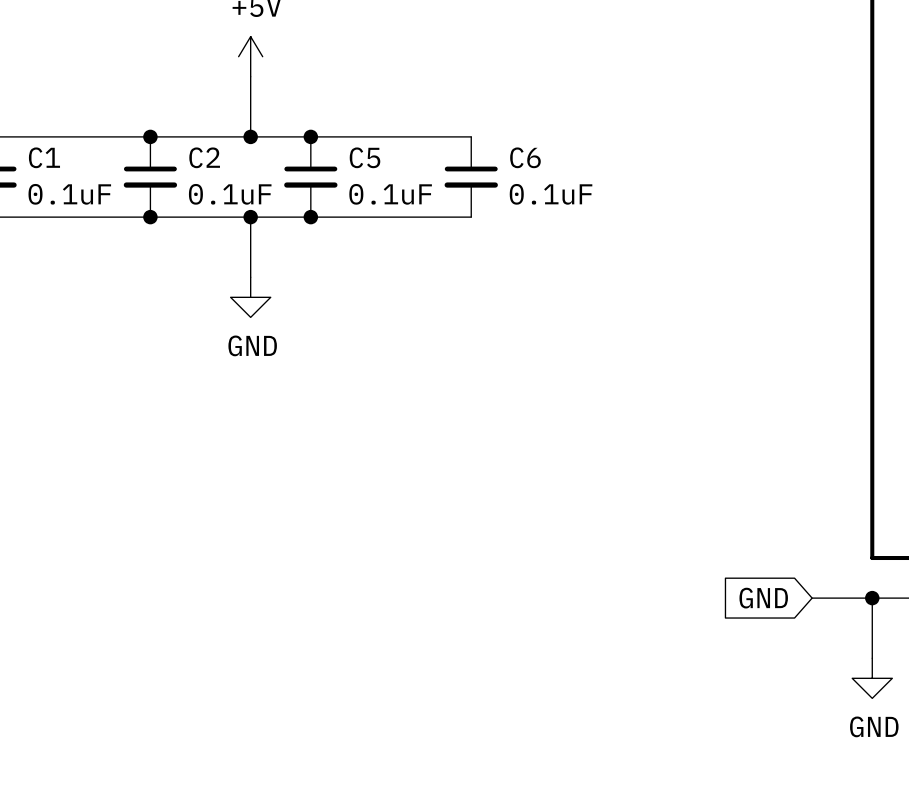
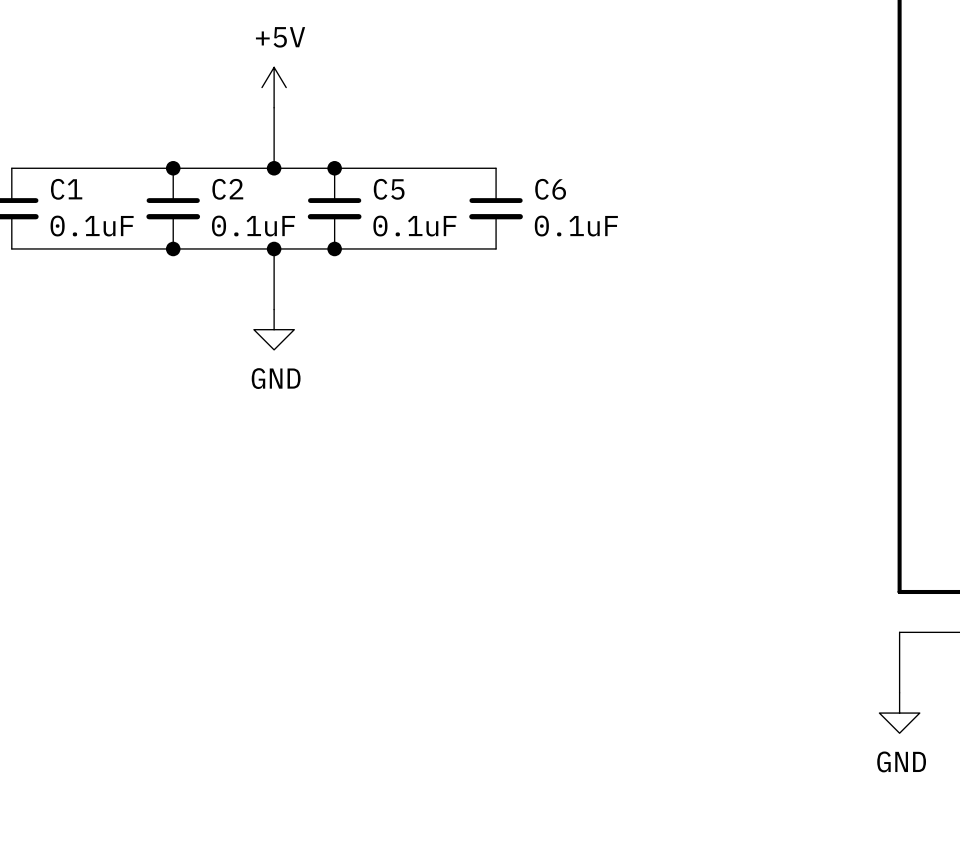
global label: GND (763, 598) -> none
wire: (812, 598) (872, 598) -> none
junction: (872, 598) -> none

